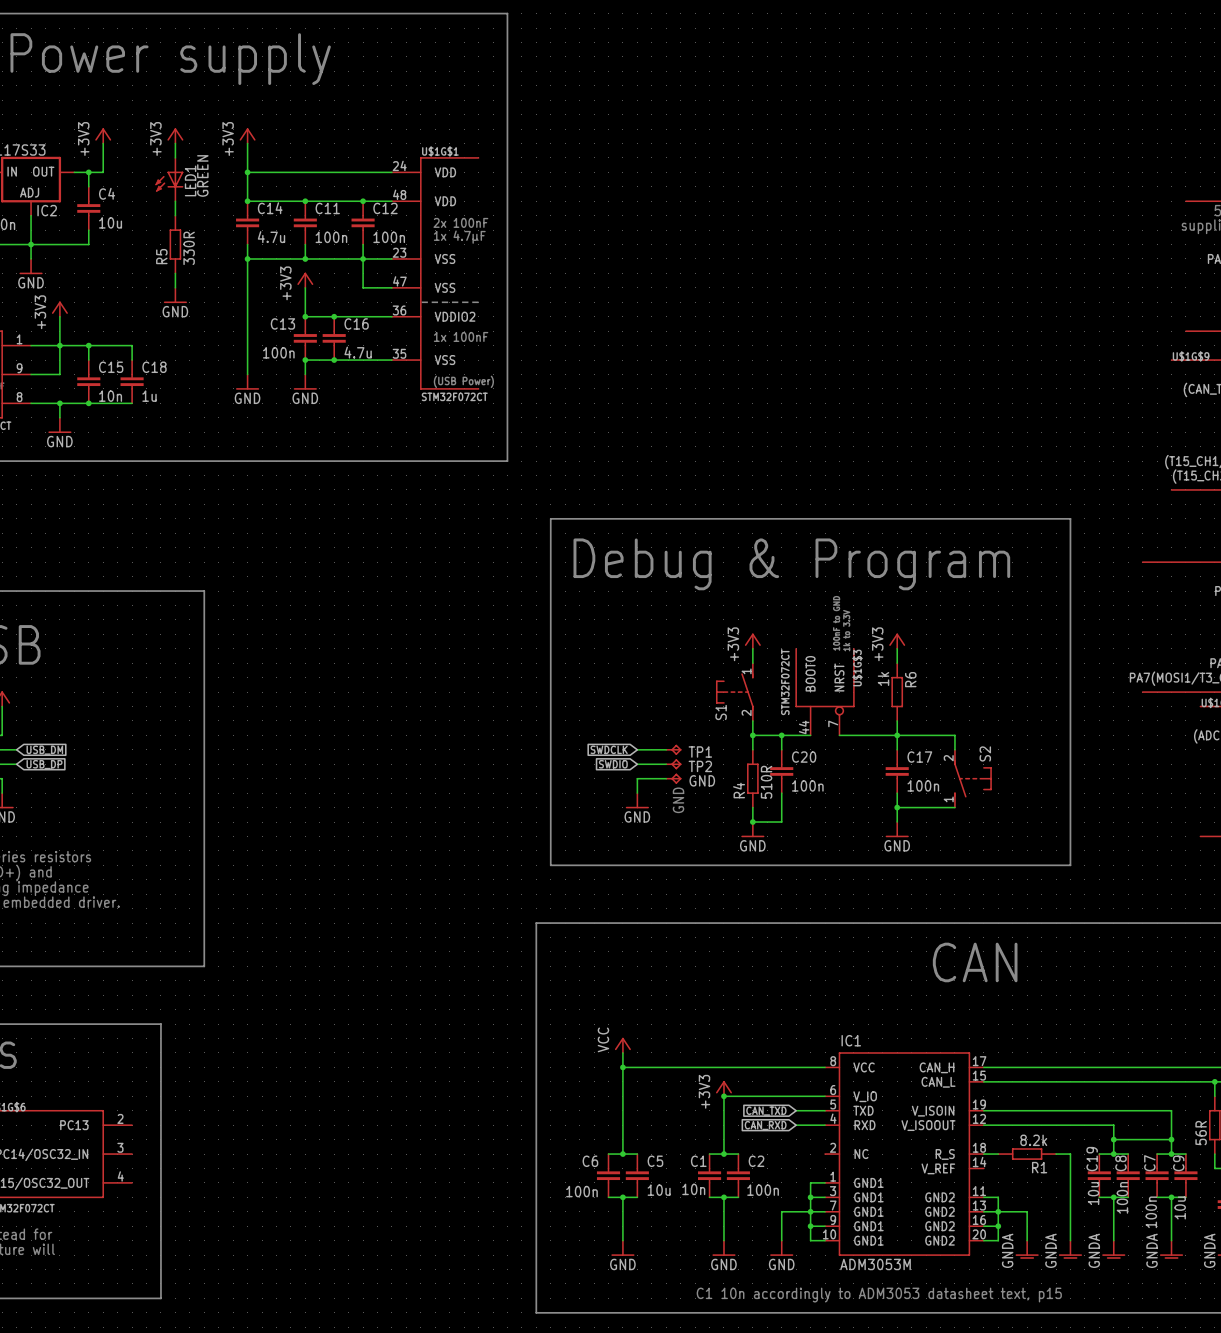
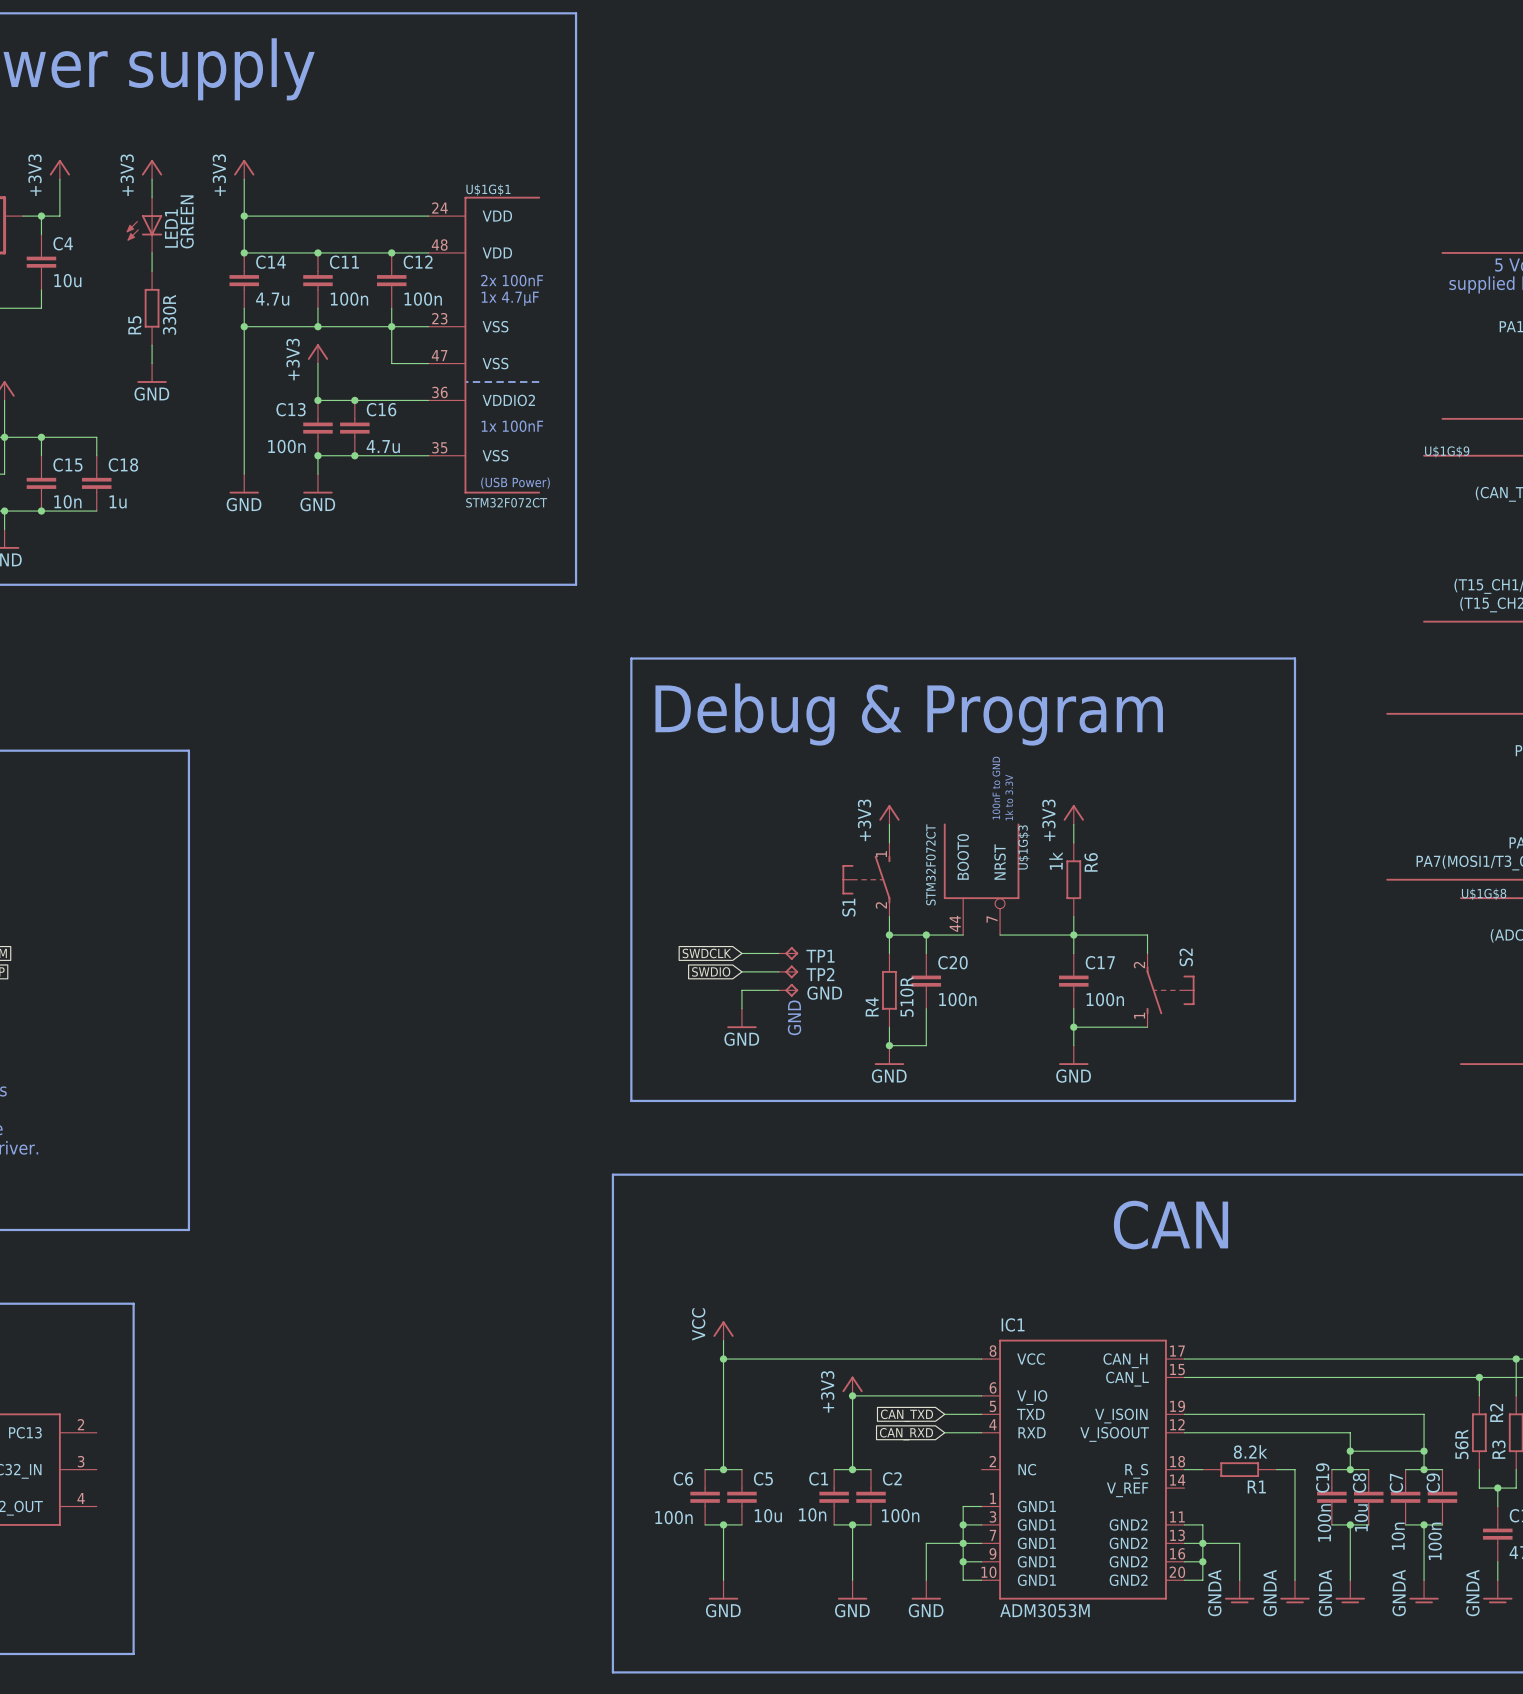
C19 value: 10u (1093, 1193) -> 100n (1324, 1522)
C8 value: 100n (1122, 1197) -> 10u (1361, 1517)
C9 value: 10u (1180, 1207) -> 100n (1435, 1541)
C7 value: 100n (1151, 1212) -> 10n (1398, 1536)
text: C1 10n accordingly to ADM3053 datasheet text, p15 (879, 1295) -> none

